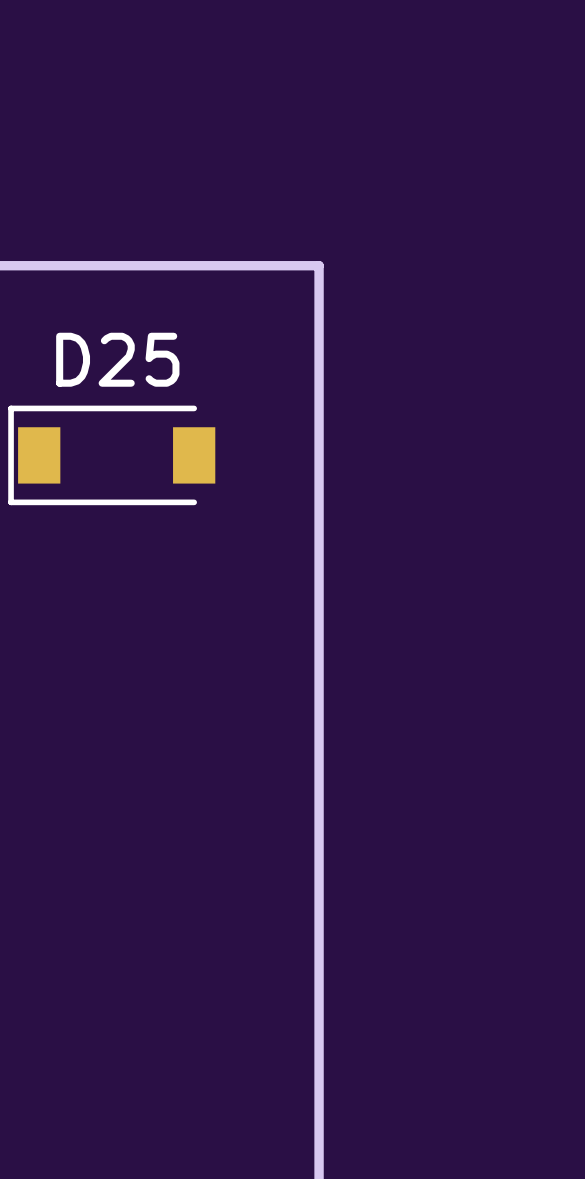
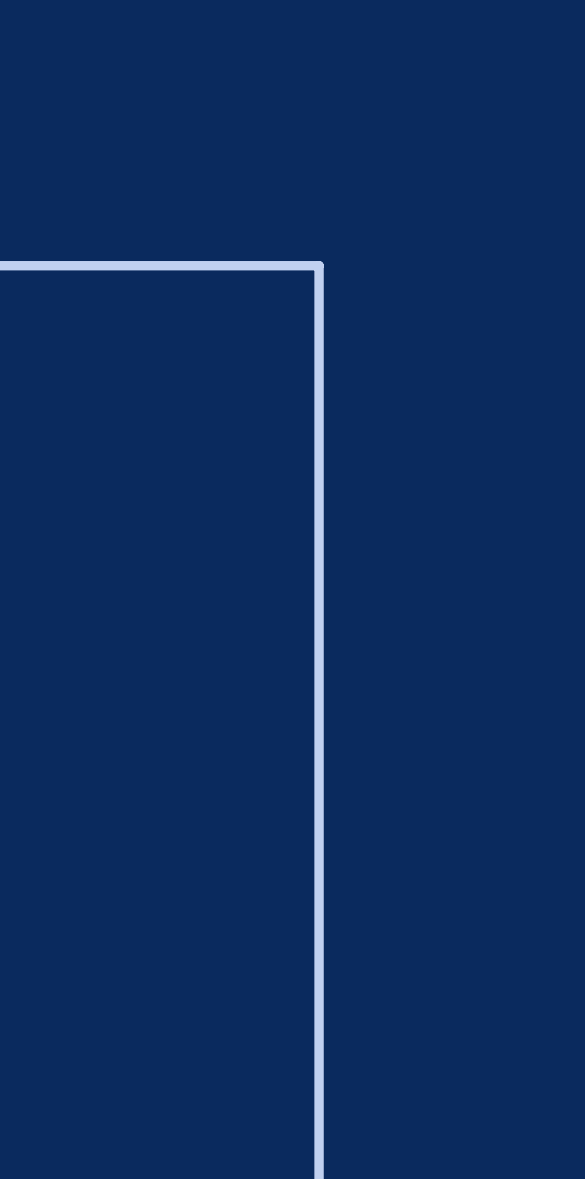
D25: (111, 455) -> none

